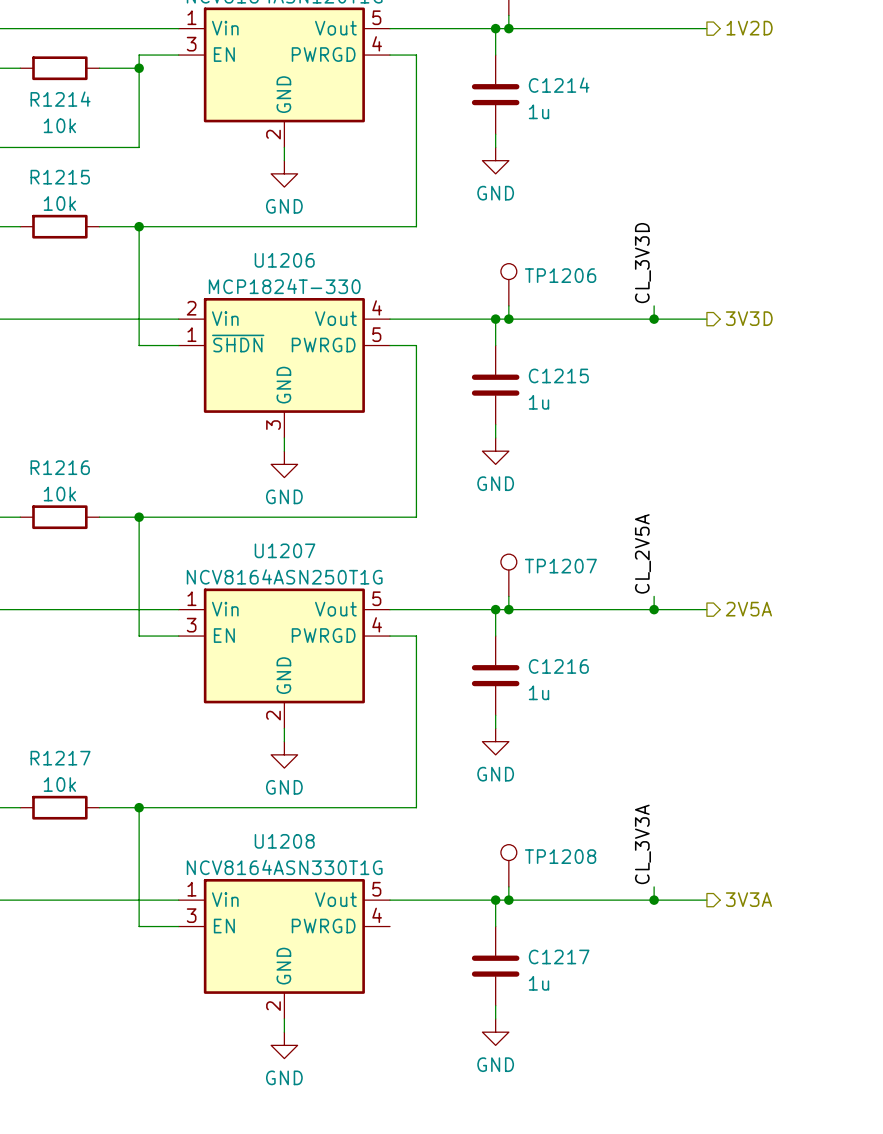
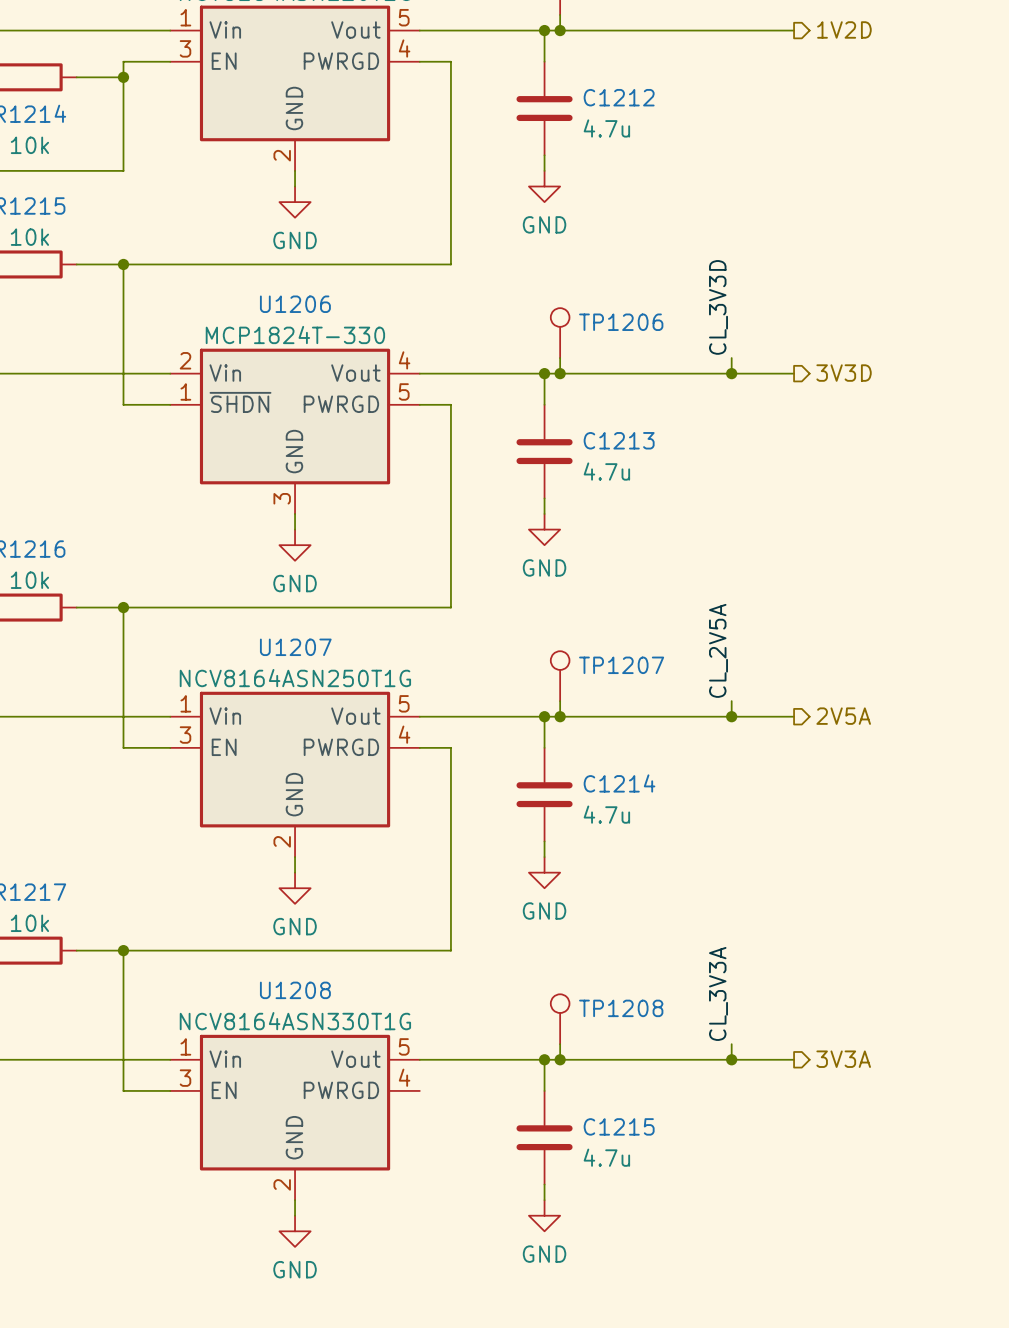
C1214 name: C1214 (559, 85) -> C1212 (619, 97)
C1214 value: 1u (539, 111) -> 4.7u (606, 128)
C1215 name: C1215 (558, 375) -> C1213 (619, 440)
C1215 value: 1u (539, 402) -> 4.7u (606, 471)
C1216 name: C1216 (558, 666) -> C1214 (619, 783)
C1216 value: 1u (539, 692) -> 4.7u (606, 814)
C1217 name: C1217 (559, 956) -> C1215 (619, 1126)
C1217 value: 1u (539, 983) -> 4.7u (606, 1157)

